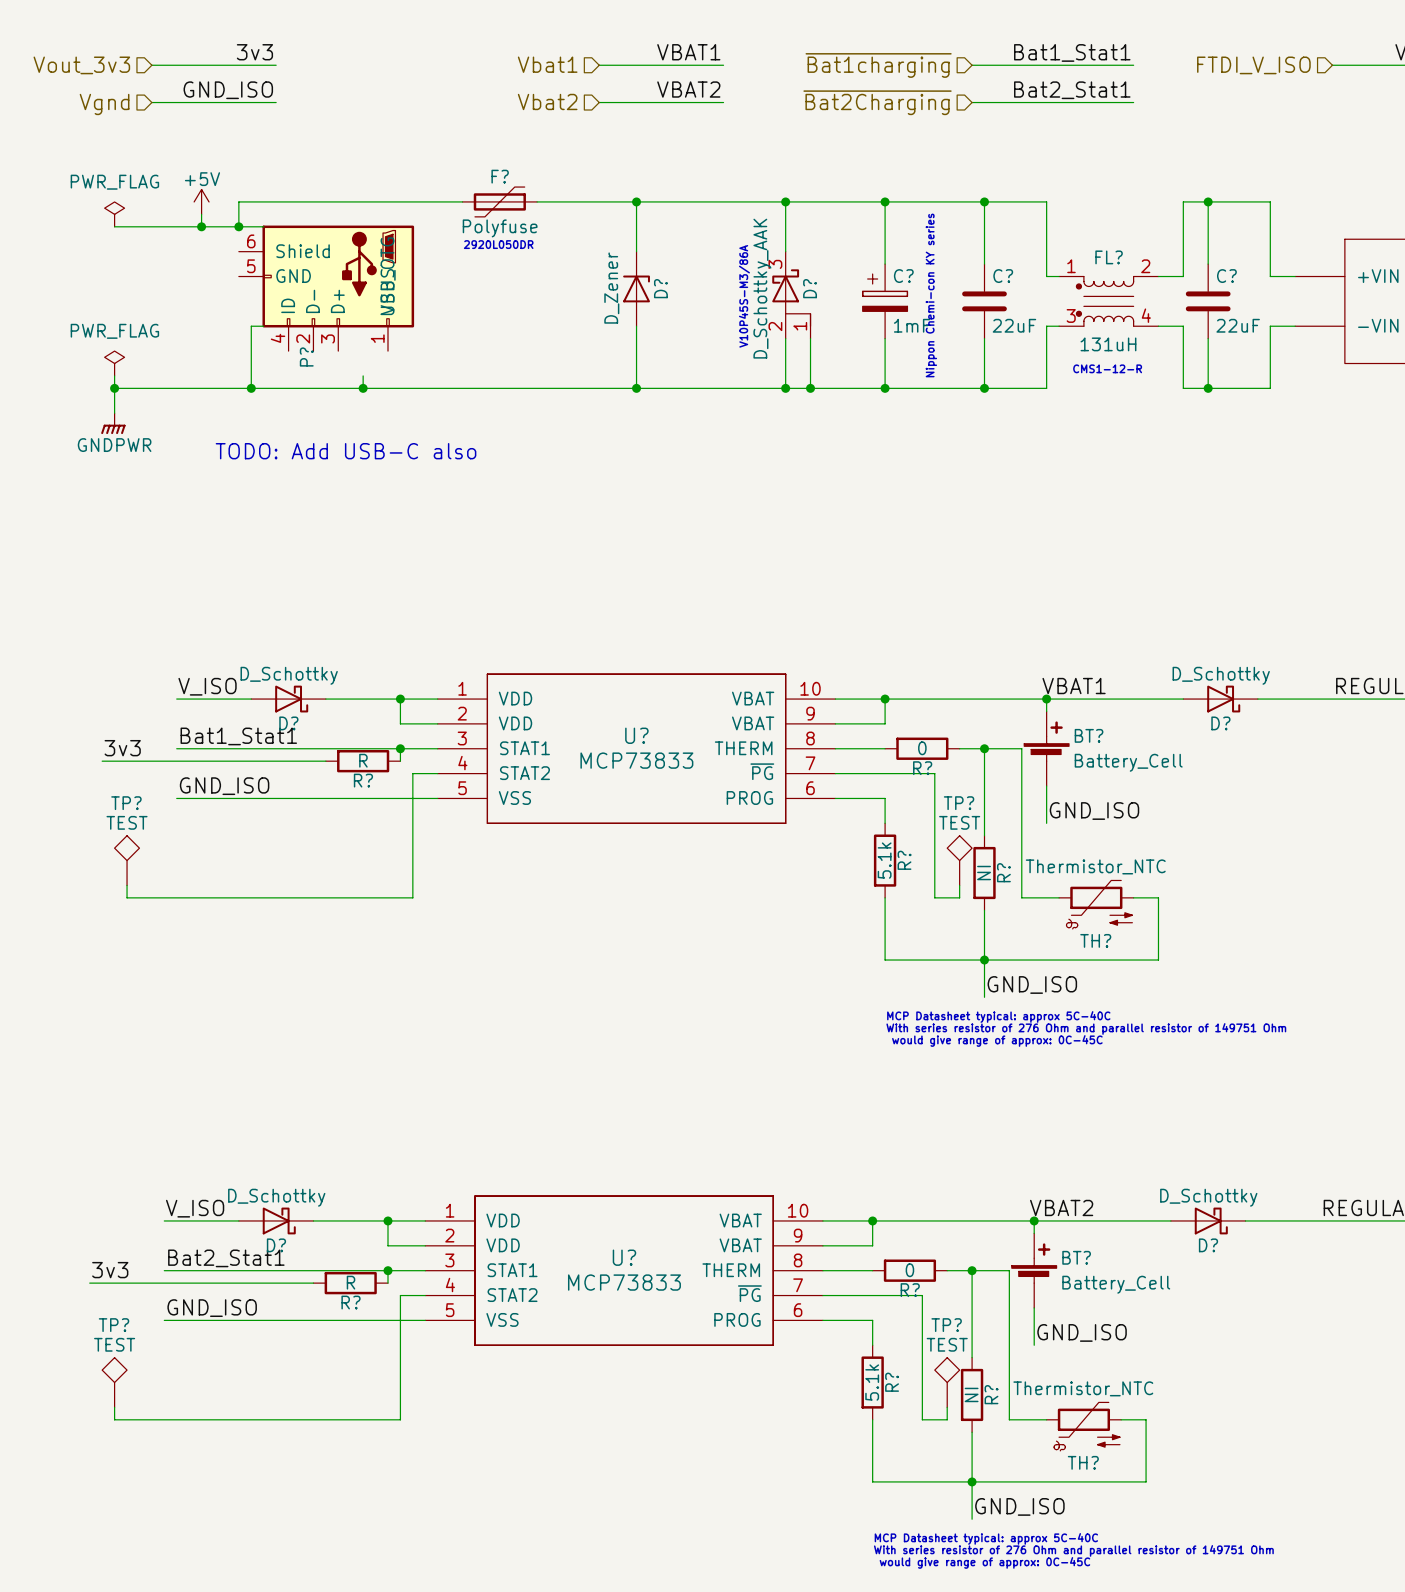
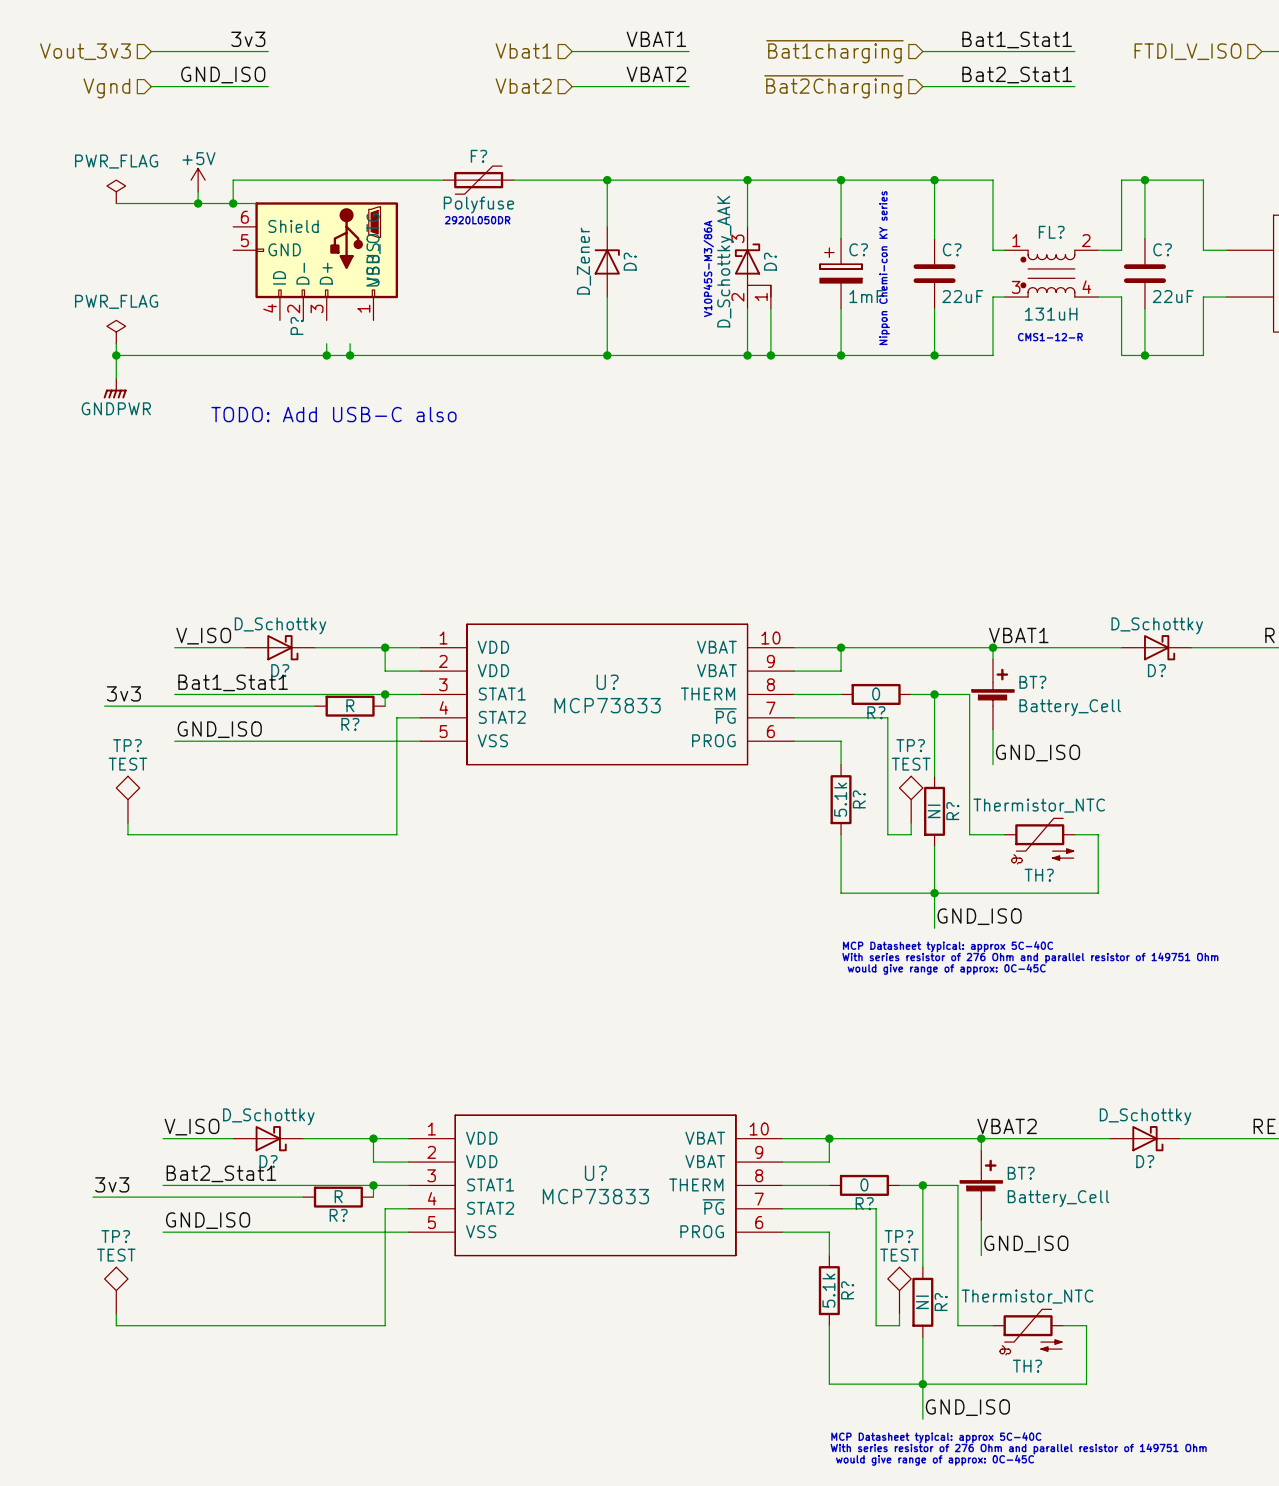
wire: (263, 326) (251, 326) (251, 388) -> none
wire: none -> (326, 343) (326, 355)
junction: (251, 388) -> none
junction: none -> (326, 355)

